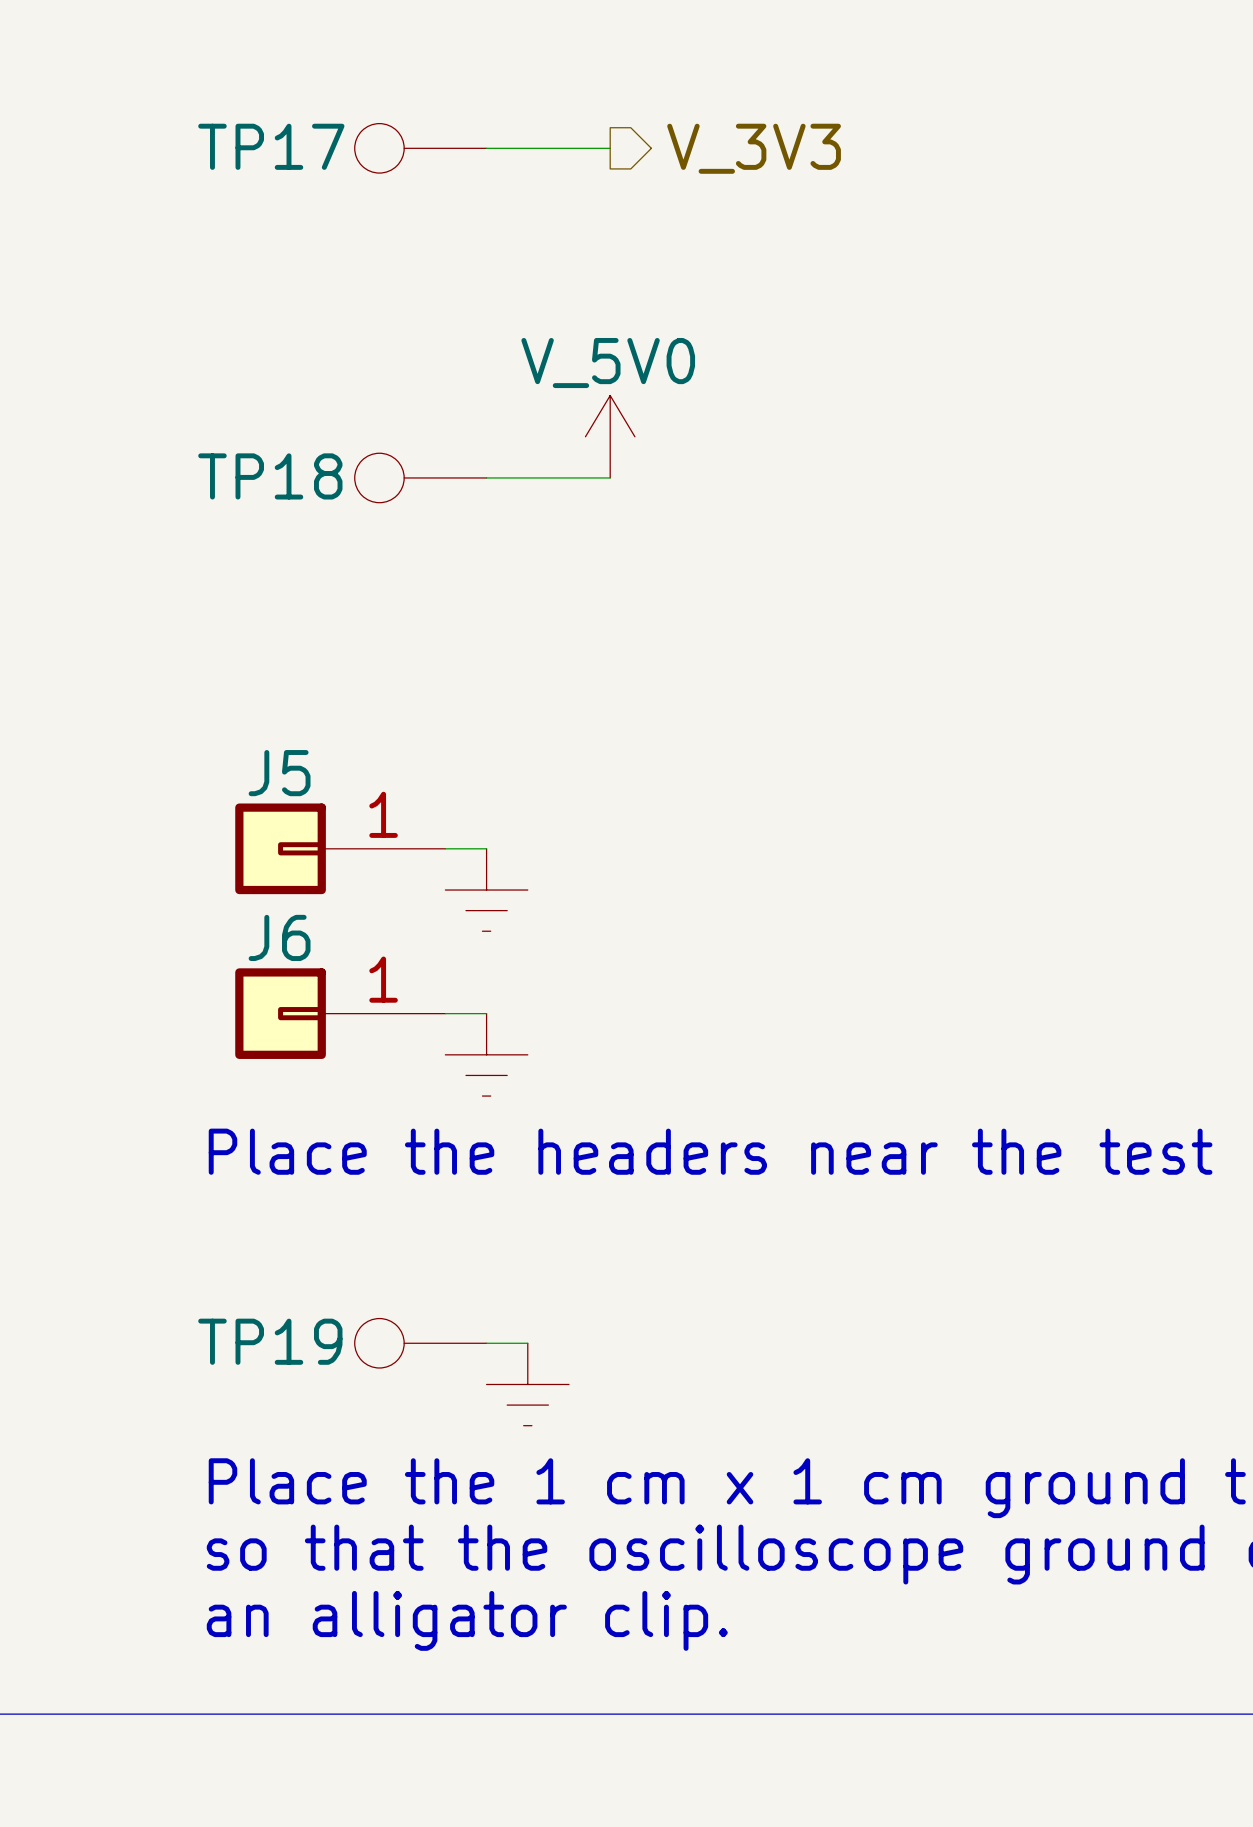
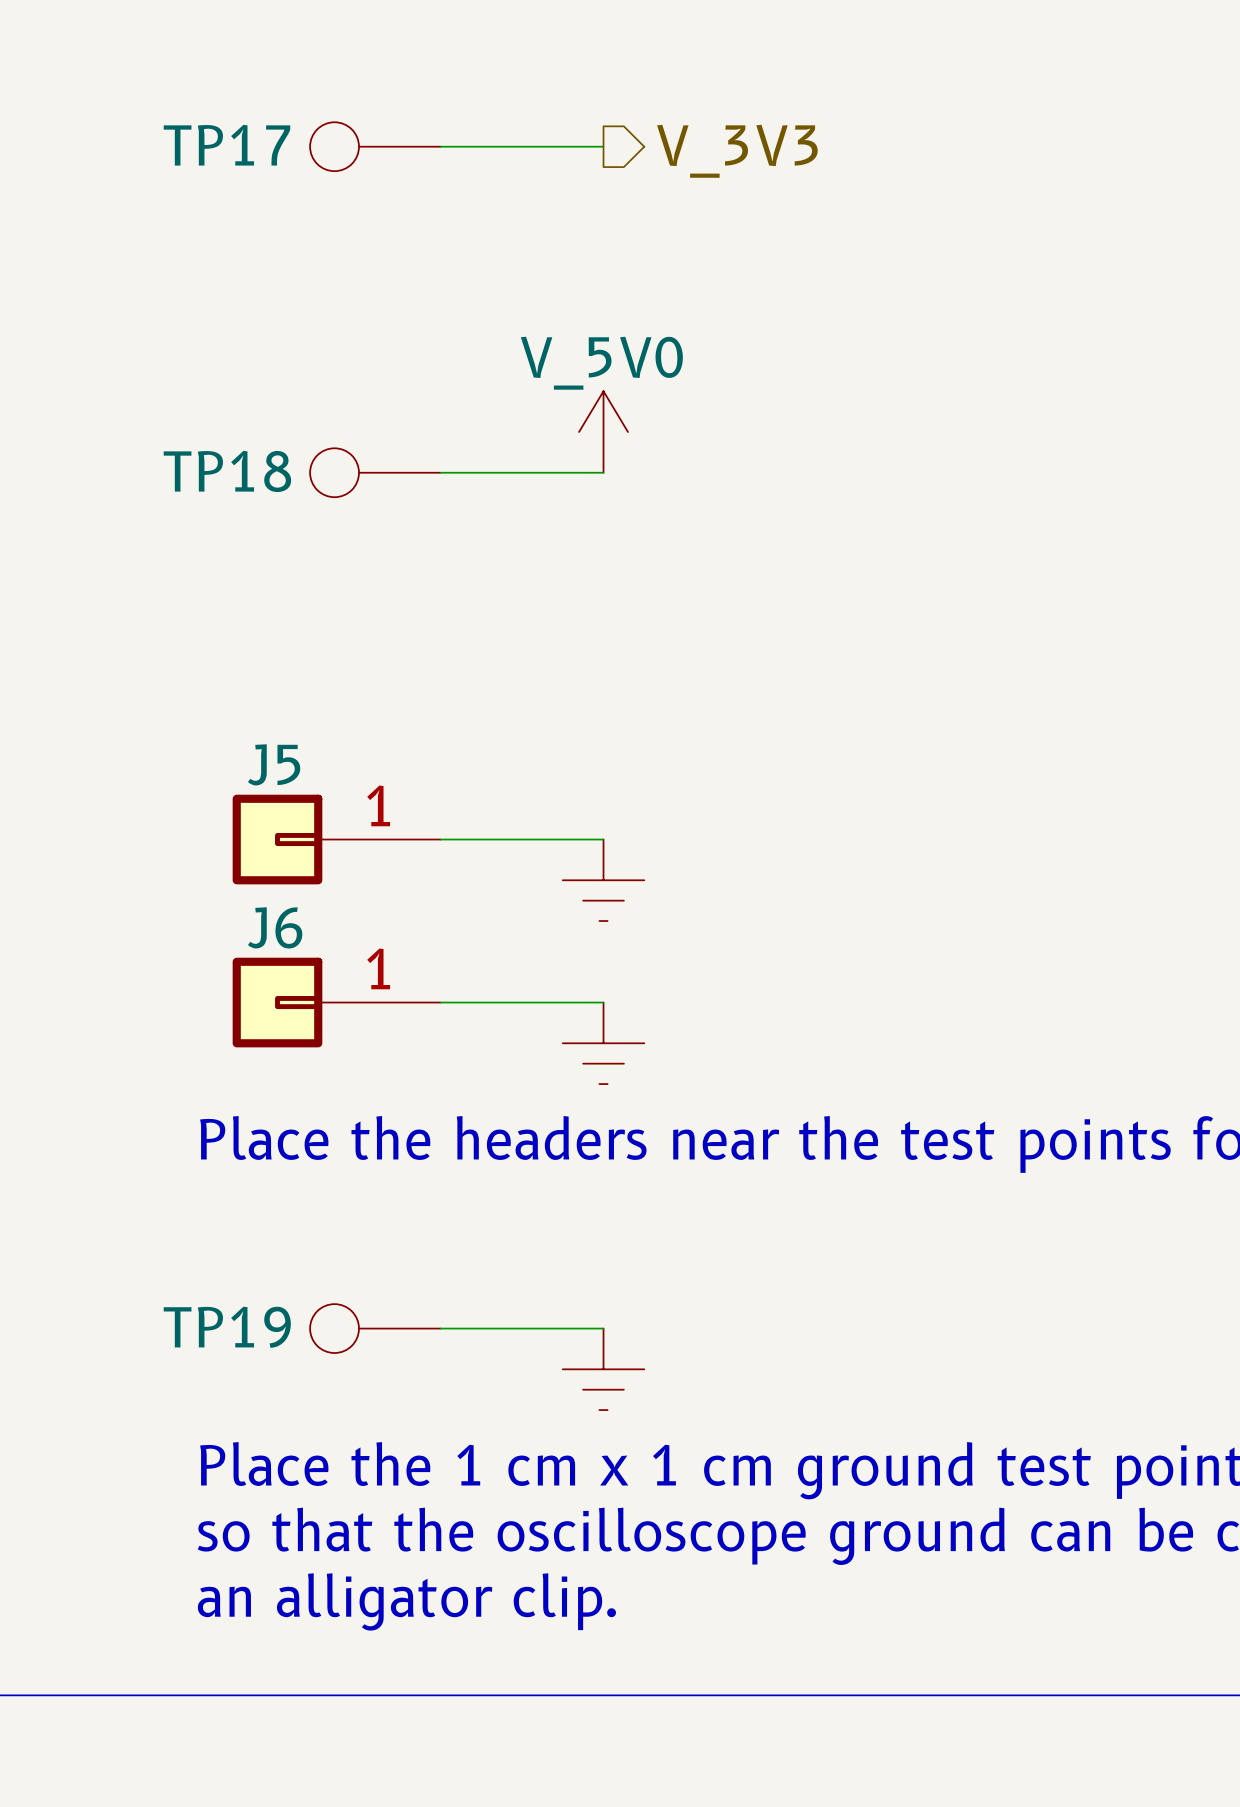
TP17 position: (420, 148) -> (375, 146)
TP18 position: (420, 477) -> (375, 472)
wire: none -> (481, 839) (603, 839)
power symbol: (486, 890) -> none
power symbol: none -> (603, 880)
wire: none -> (481, 1002) (603, 1002)
power symbol: (486, 1054) -> none
power symbol: none -> (603, 1043)
TP19 position: (420, 1343) -> (375, 1328)
wire: none -> (522, 1328) (603, 1328)
power symbol position: (527, 1384) -> (603, 1369)

